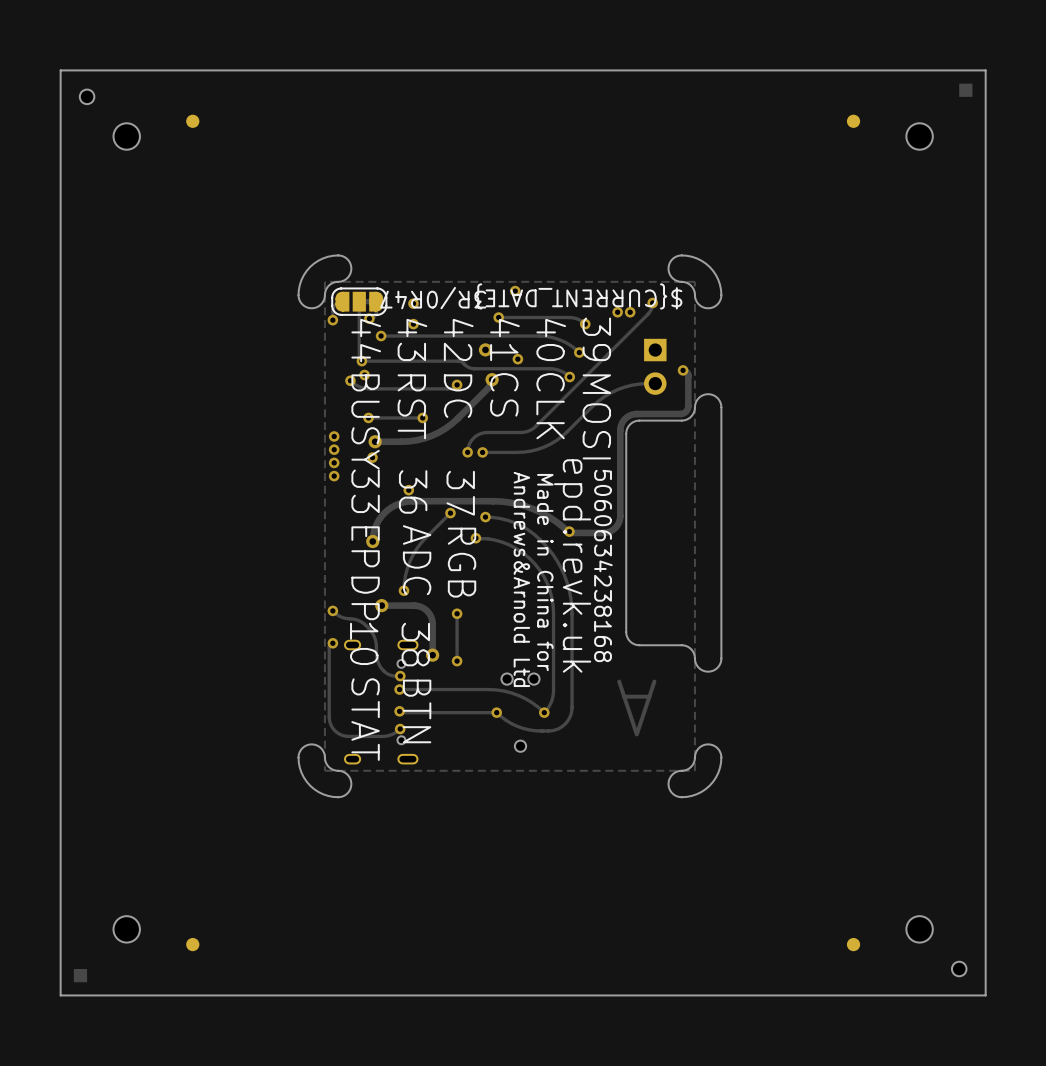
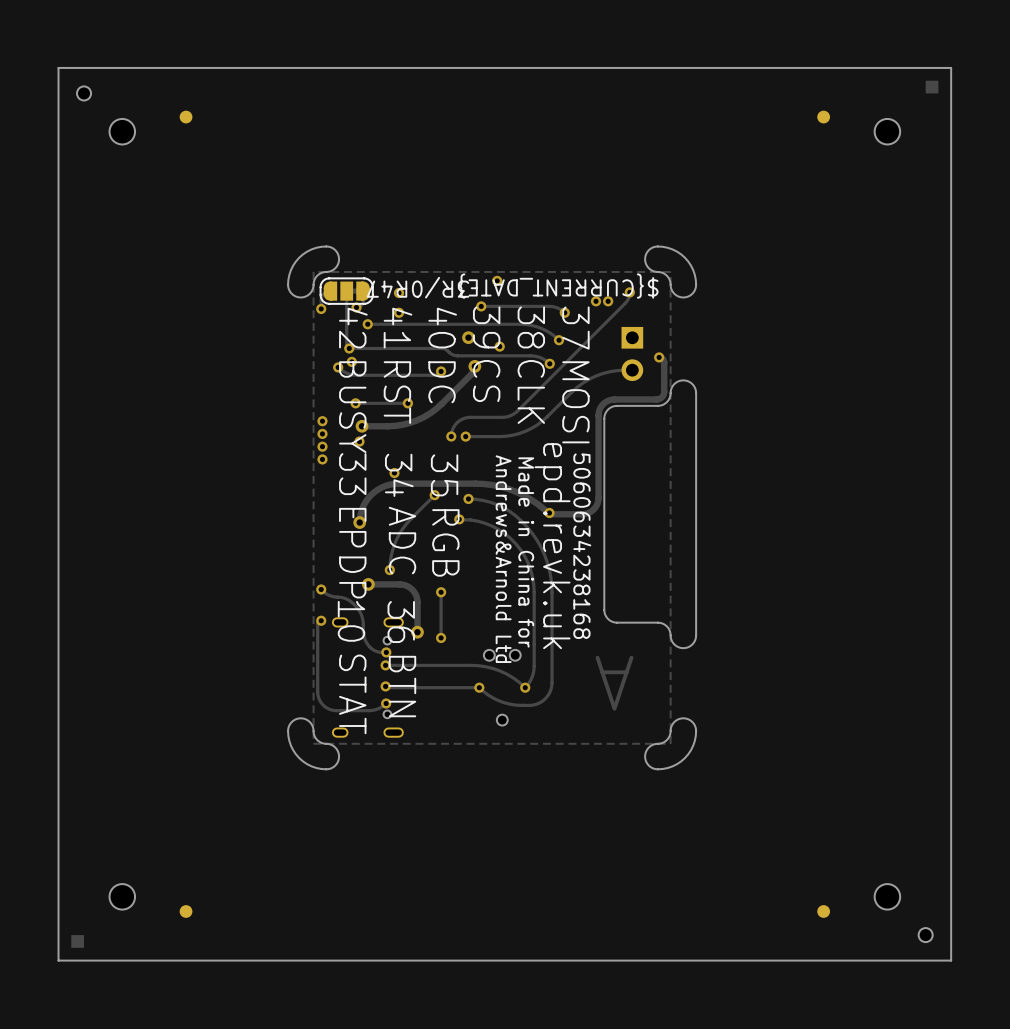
text: 43 (412, 339) -> 41 (398, 328)
text: 42 (458, 339) -> 40 (442, 328)
text: 41 (504, 339) -> 39 (486, 327)
text: 40 (551, 339) -> 38 (531, 327)
text: 39 (596, 339) -> 37 (575, 328)
text: 44 (366, 340) -> 42 (353, 328)
text: 36 (413, 491) -> 34 (399, 475)
text: 37 (460, 493) -> 35 (444, 475)
text: 38 (415, 644) -> 36 (401, 622)

